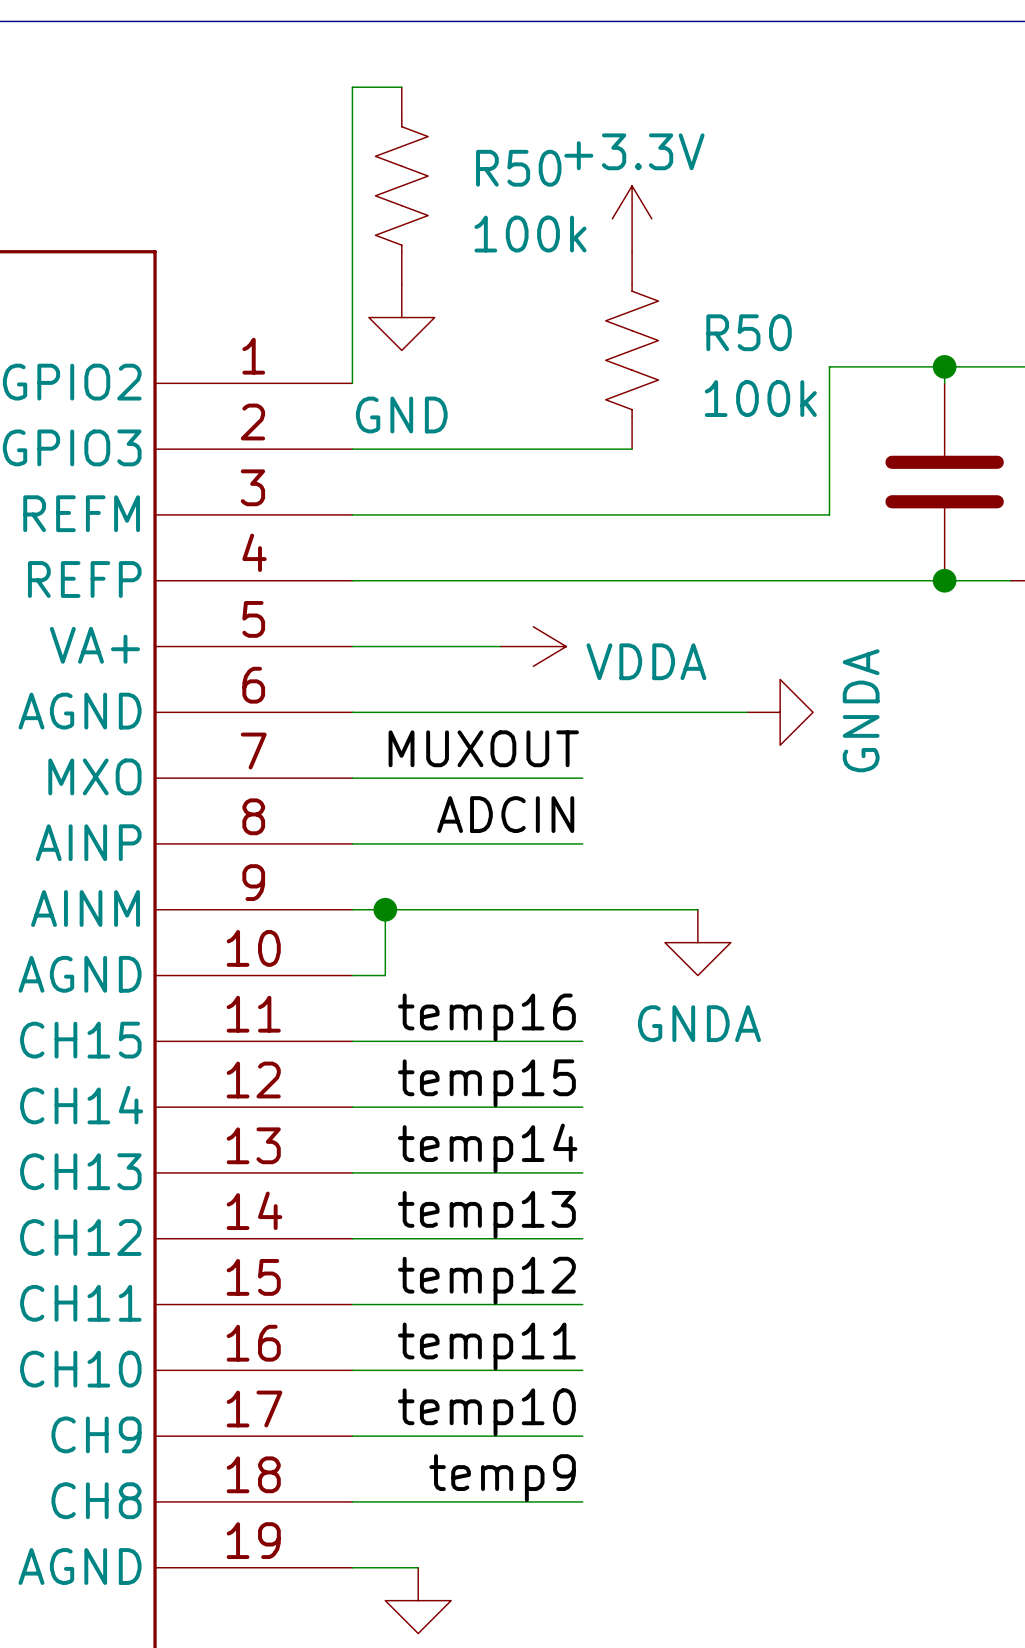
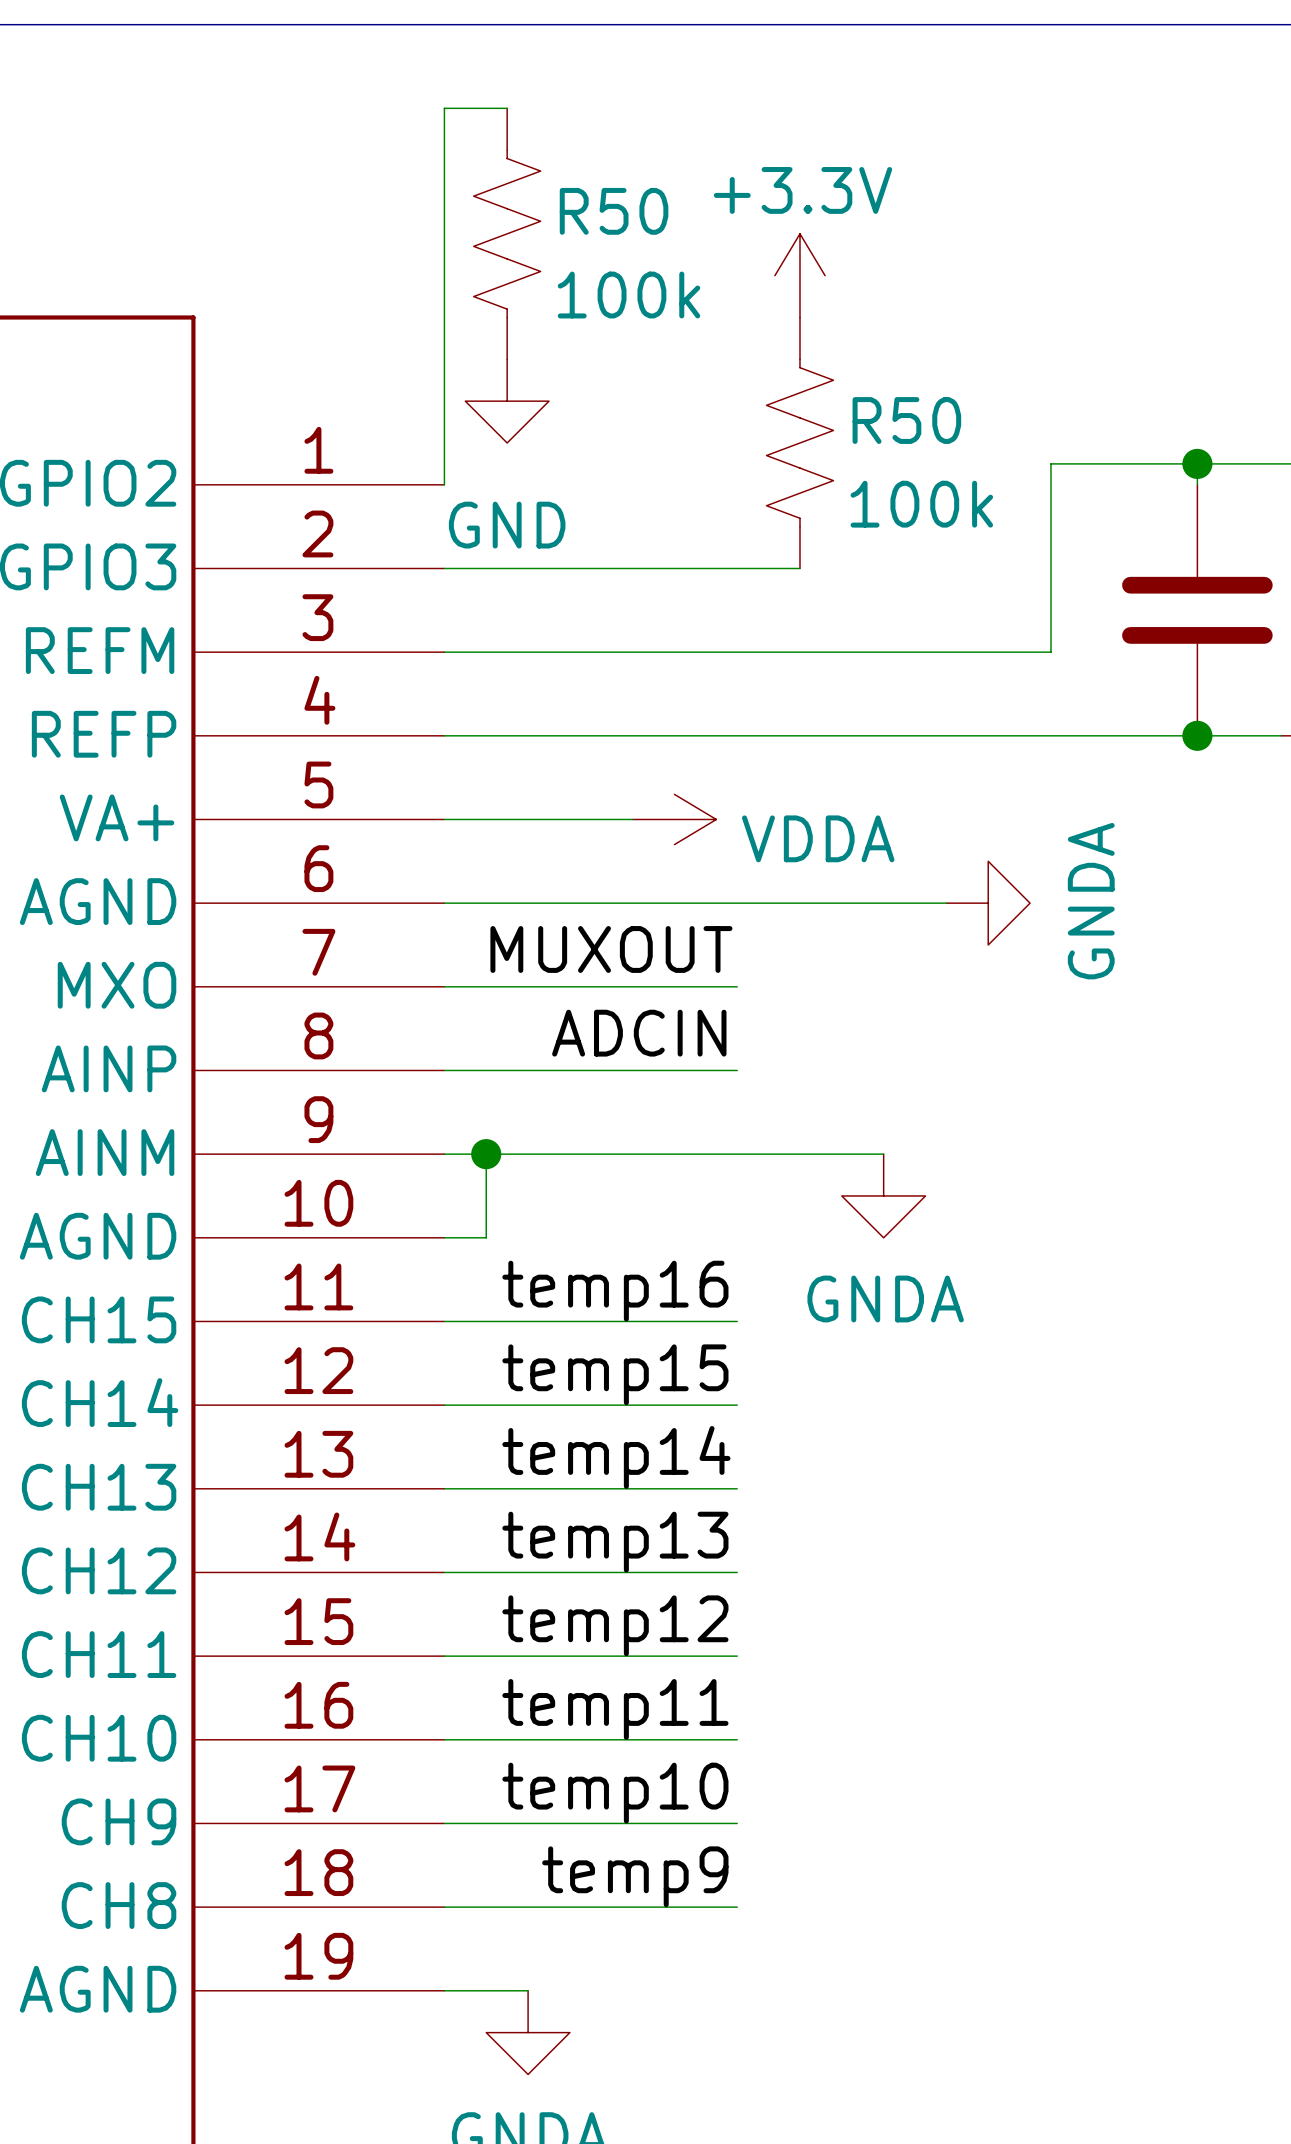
R50 name position: R50 (518, 168) -> R50 (614, 211)
R50 value position: 100k (530, 234) -> 100k (628, 295)
R50 name position: R50 (749, 332) -> R50 (906, 420)
R50 value position: 100k (760, 398) -> 100k (921, 504)

